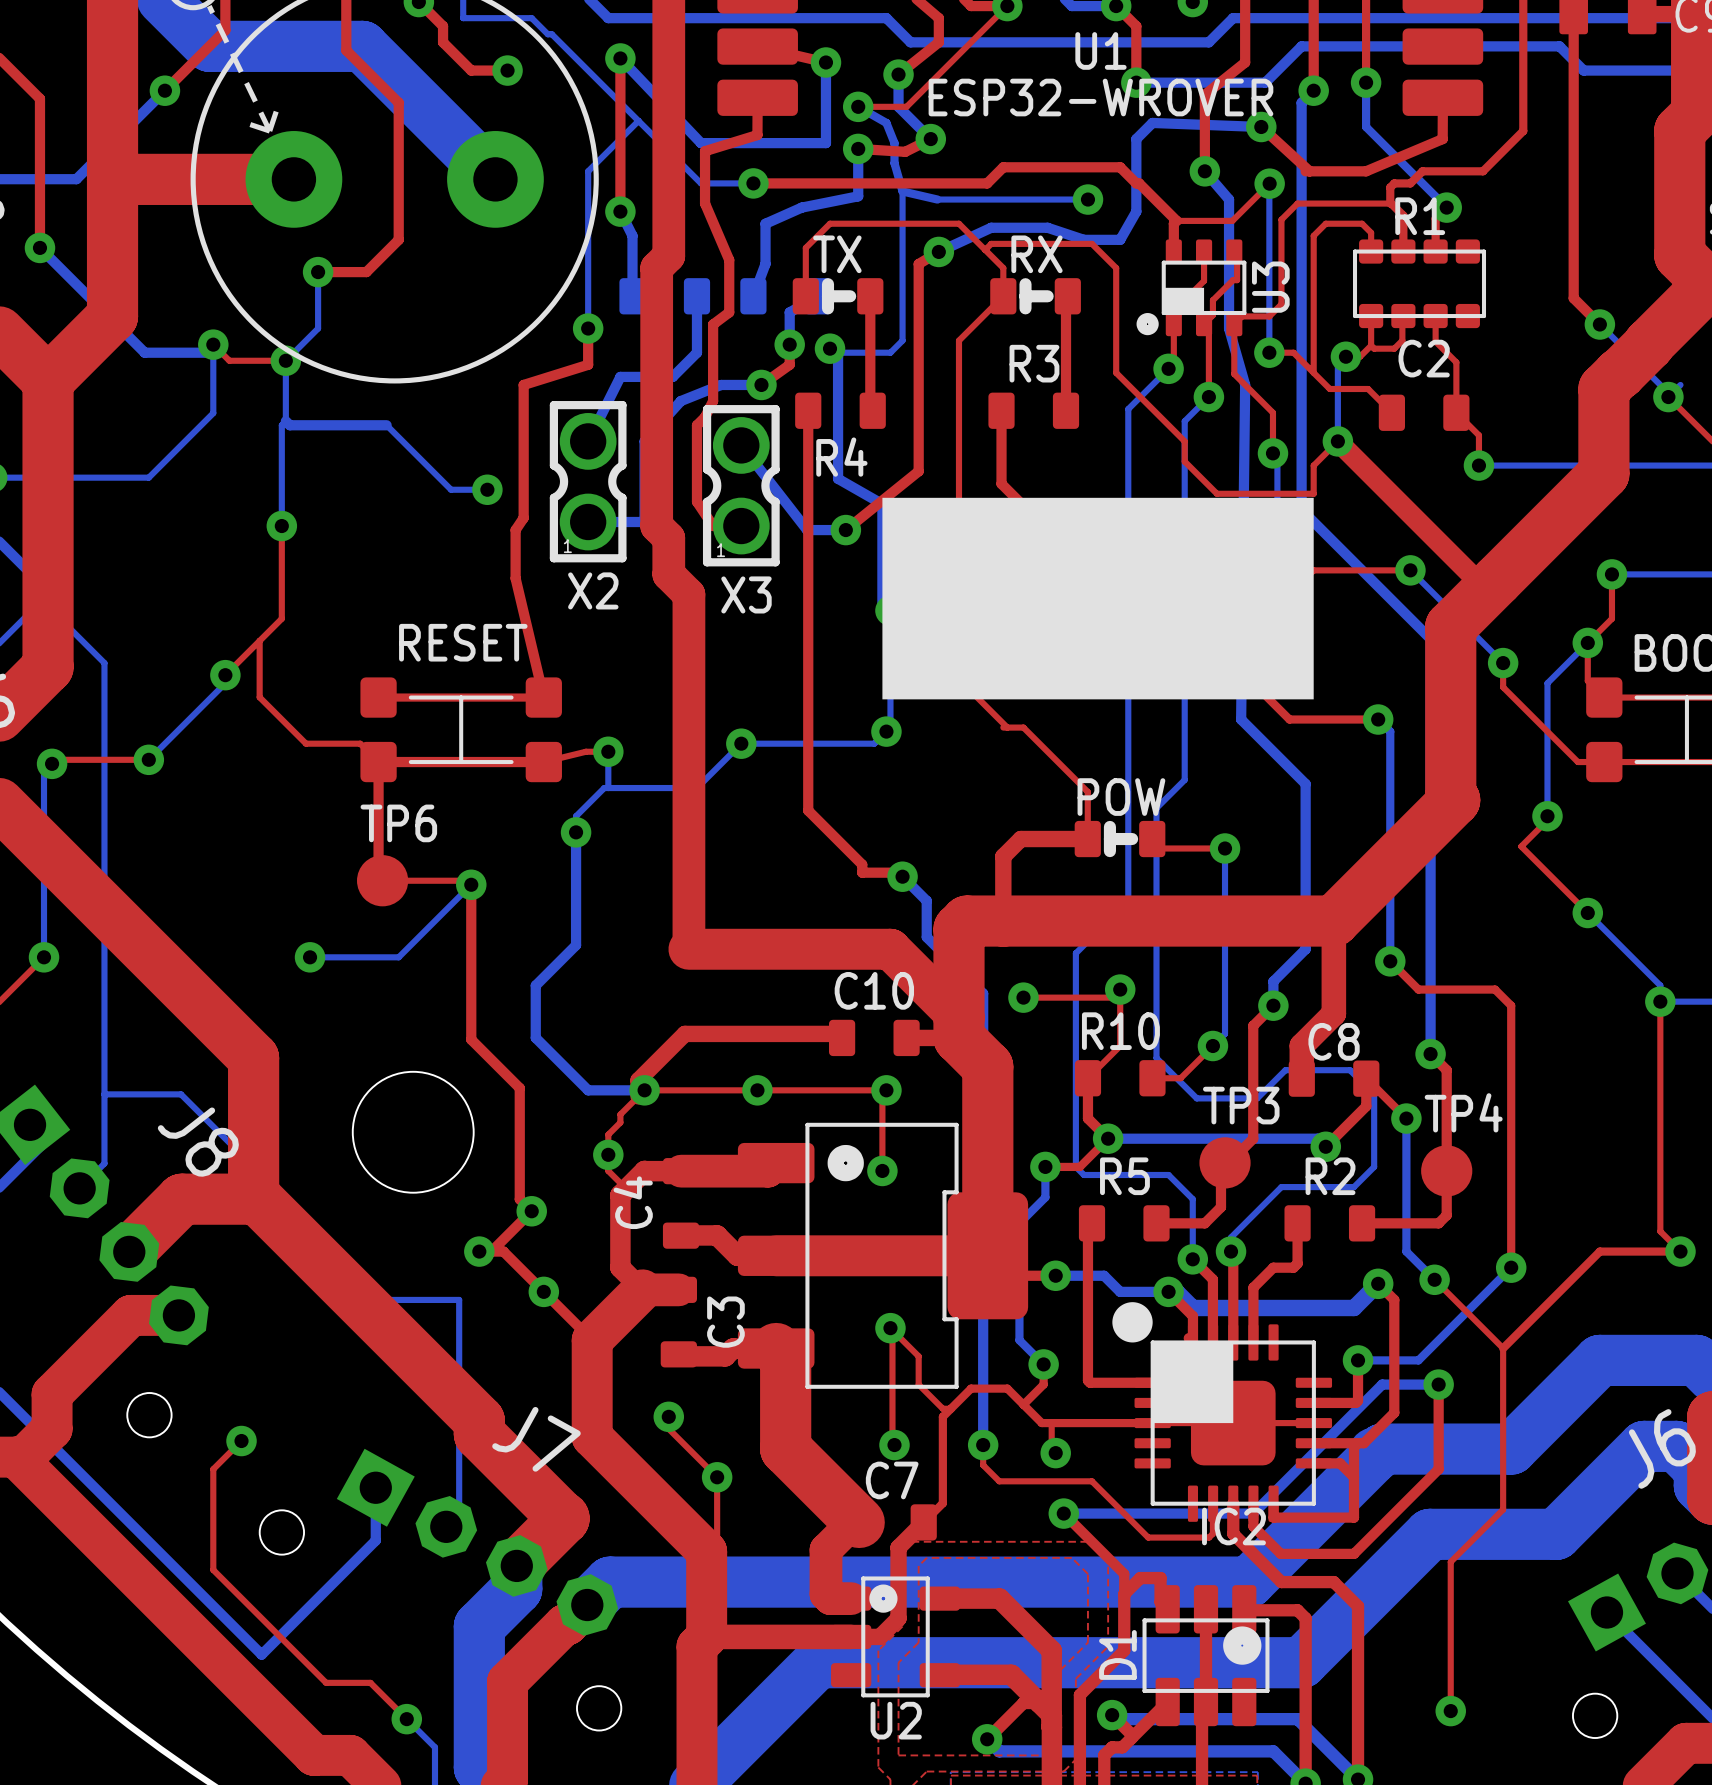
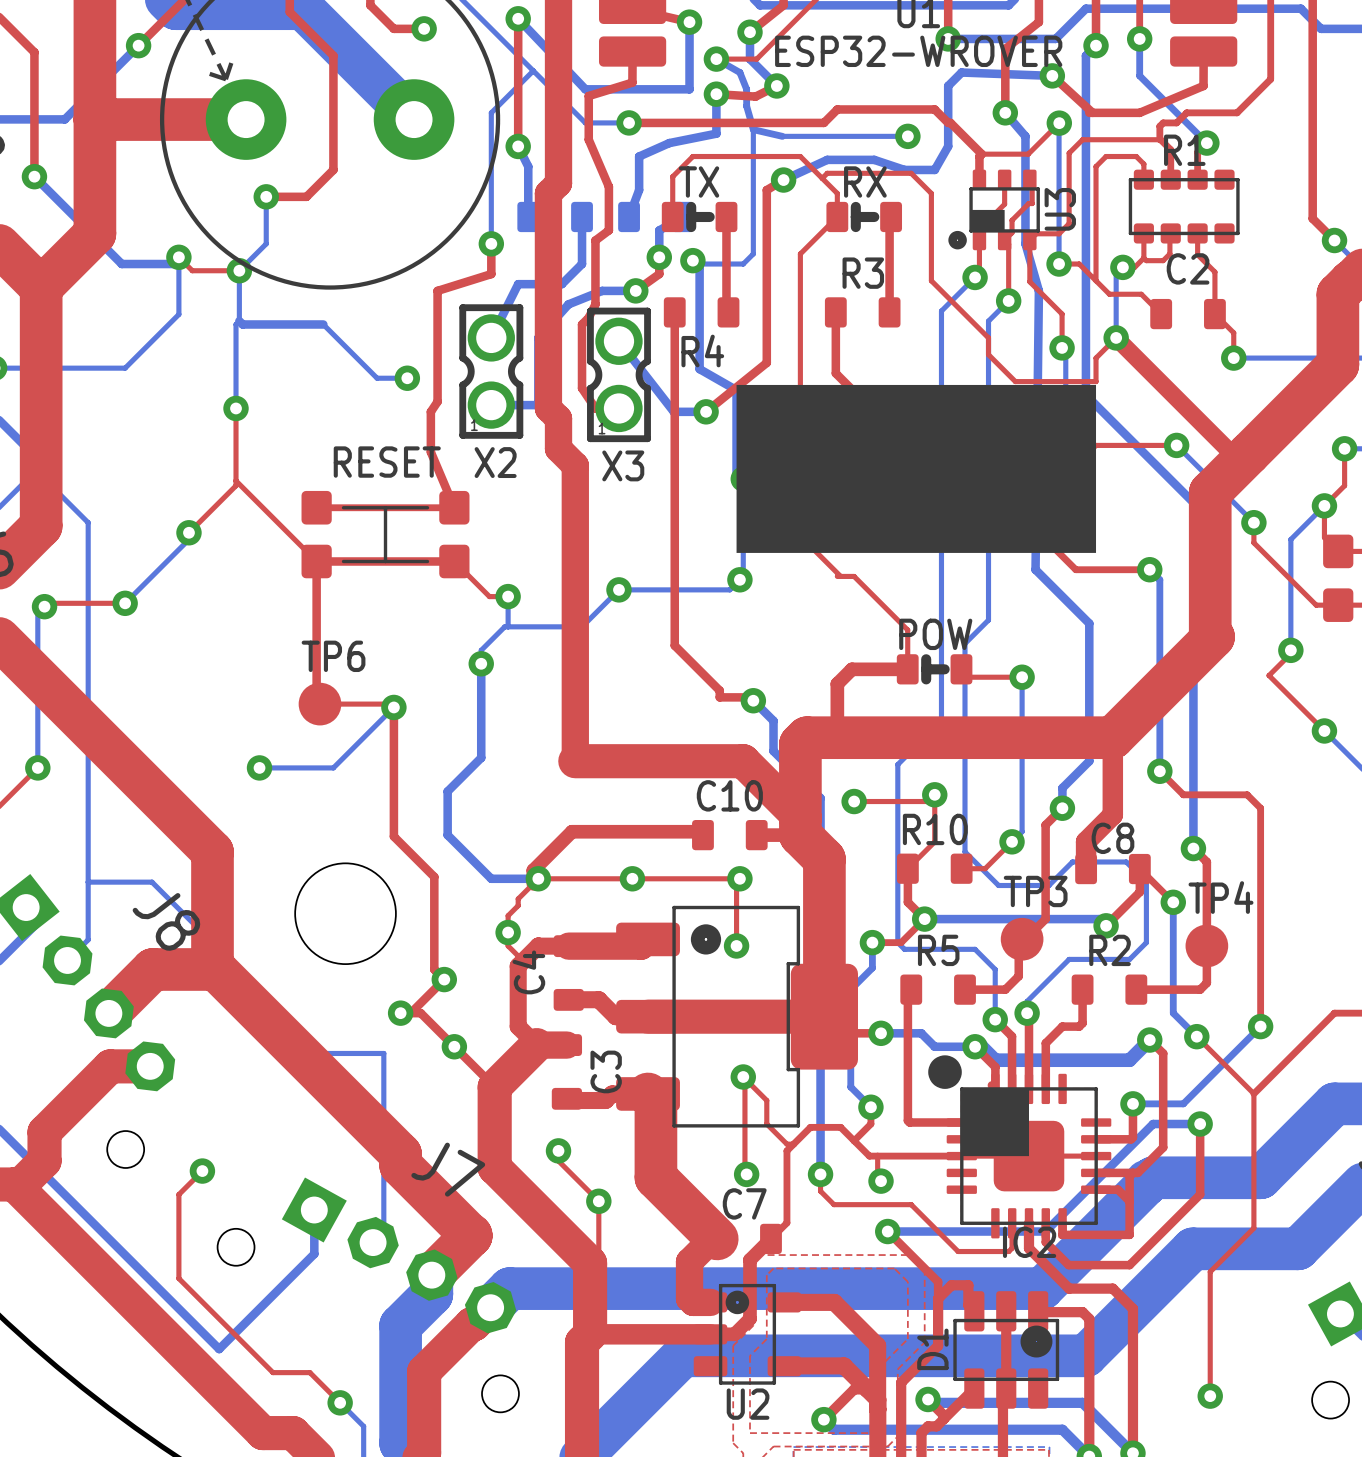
top track: (515, 578) (543, 697) (378, 697) -> (430, 452) (454, 507) (316, 507)
top track: none -> (236, 480) (316, 561)
top track: (259, 640) (259, 697) (306, 743) (360, 743) (378, 762) (543, 762) (585, 751) -> (316, 561) (454, 561) (489, 596)
top track: none -> (316, 561) (316, 605)
RESET position: (461, 729) -> (385, 534)

